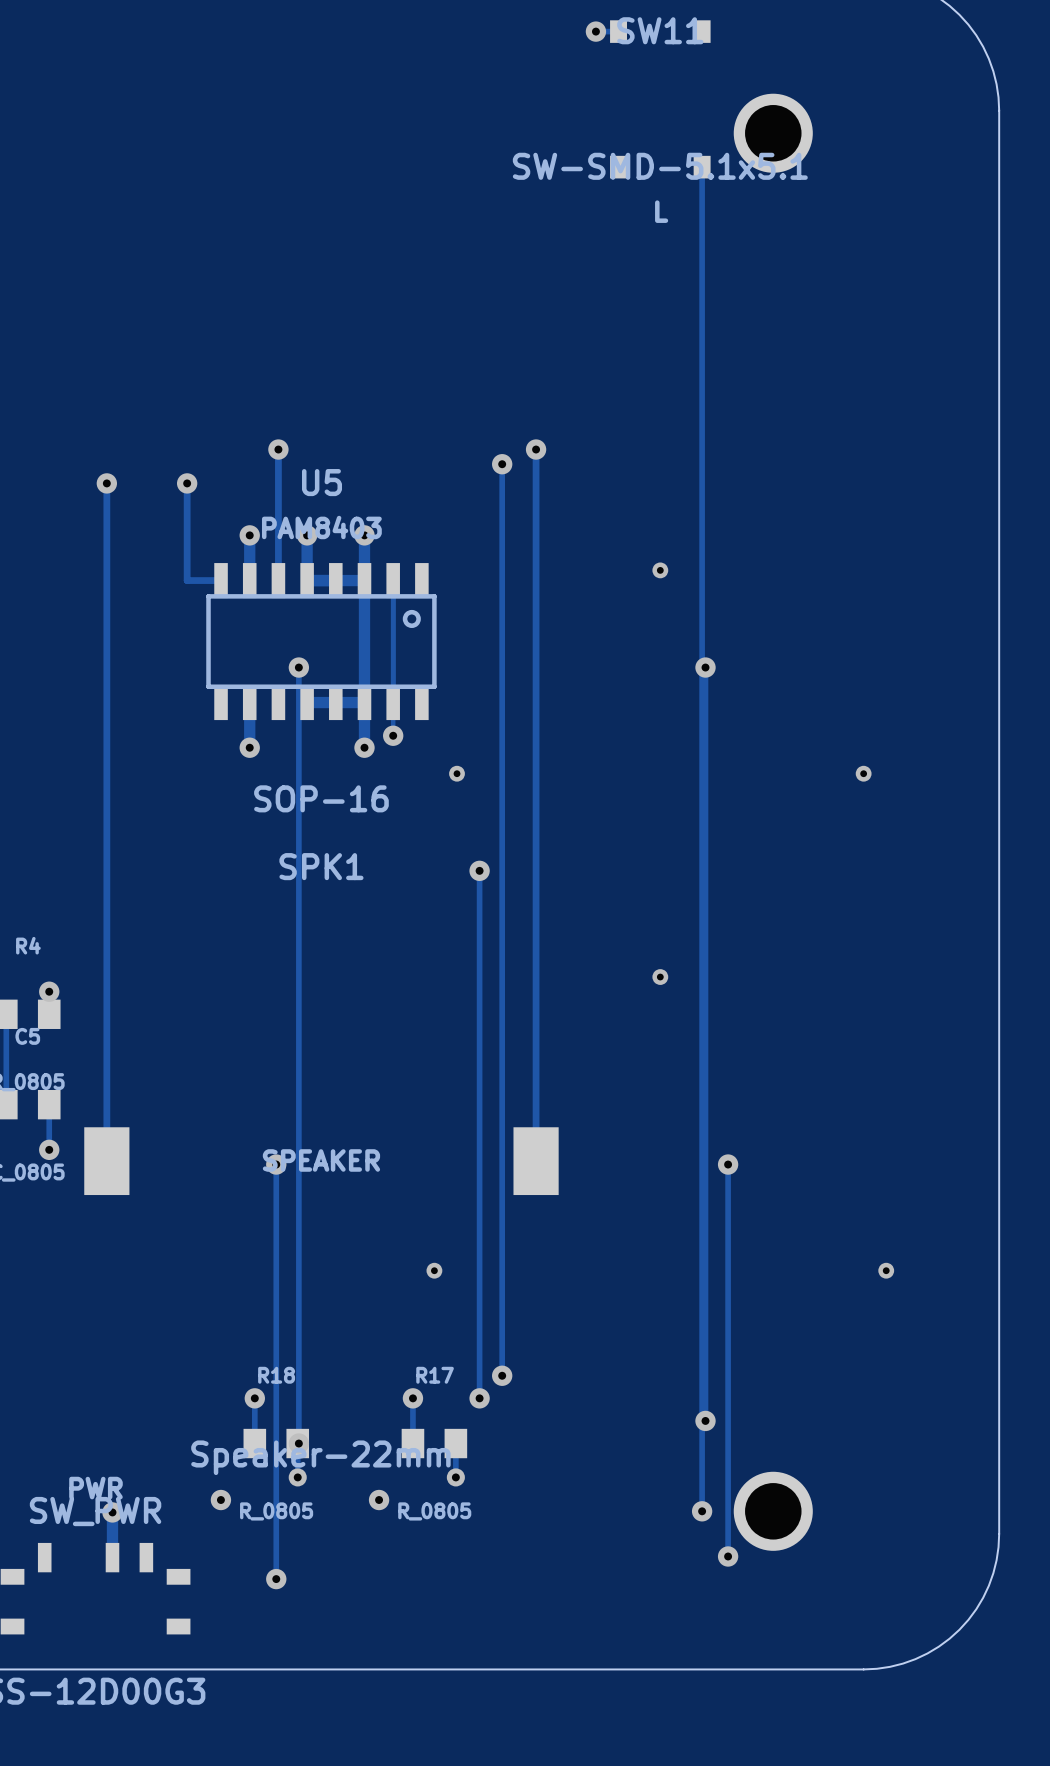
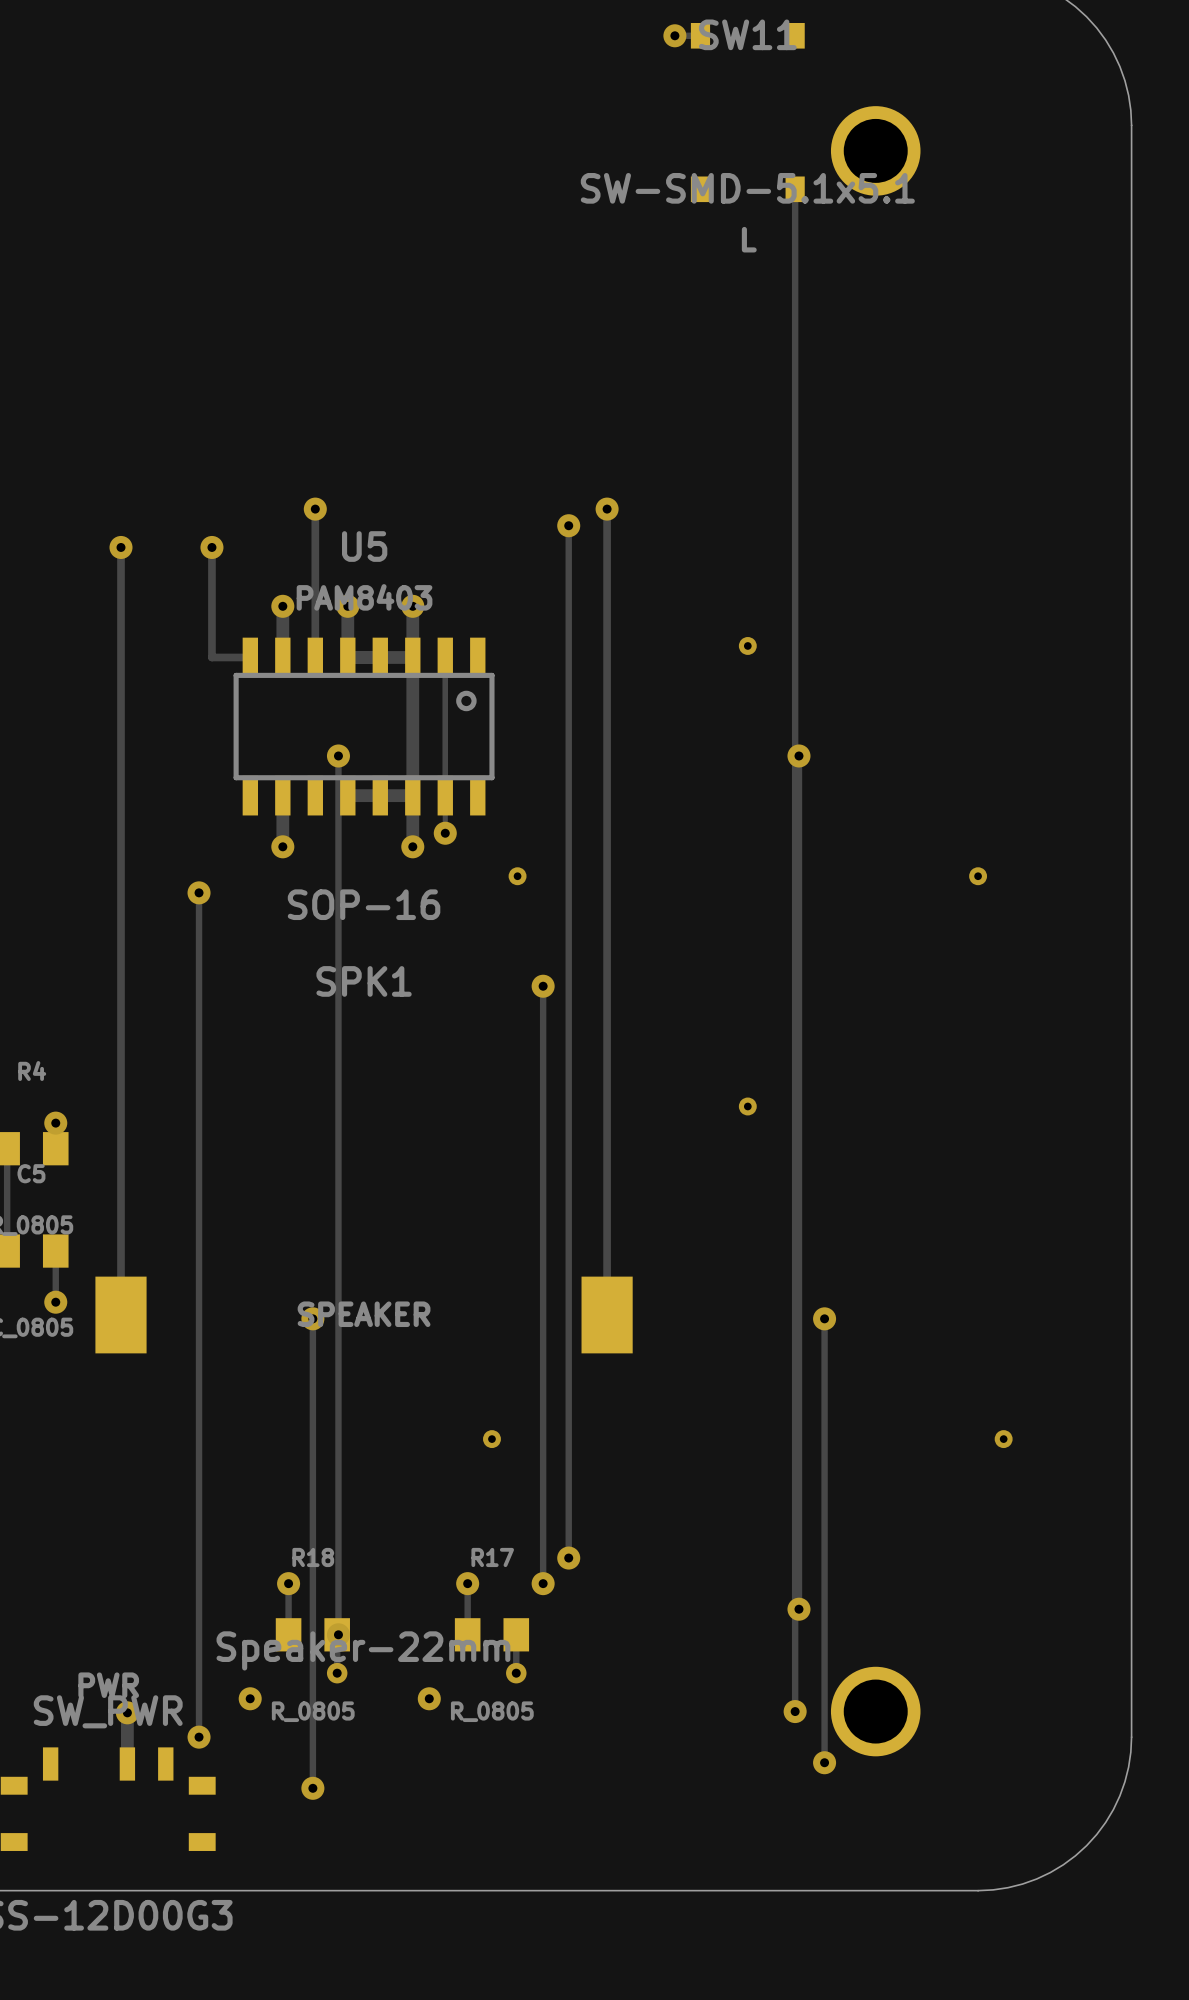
track: none -> (199, 892) (199, 1737)
via: none -> (199, 892)
via: none -> (199, 1737)

